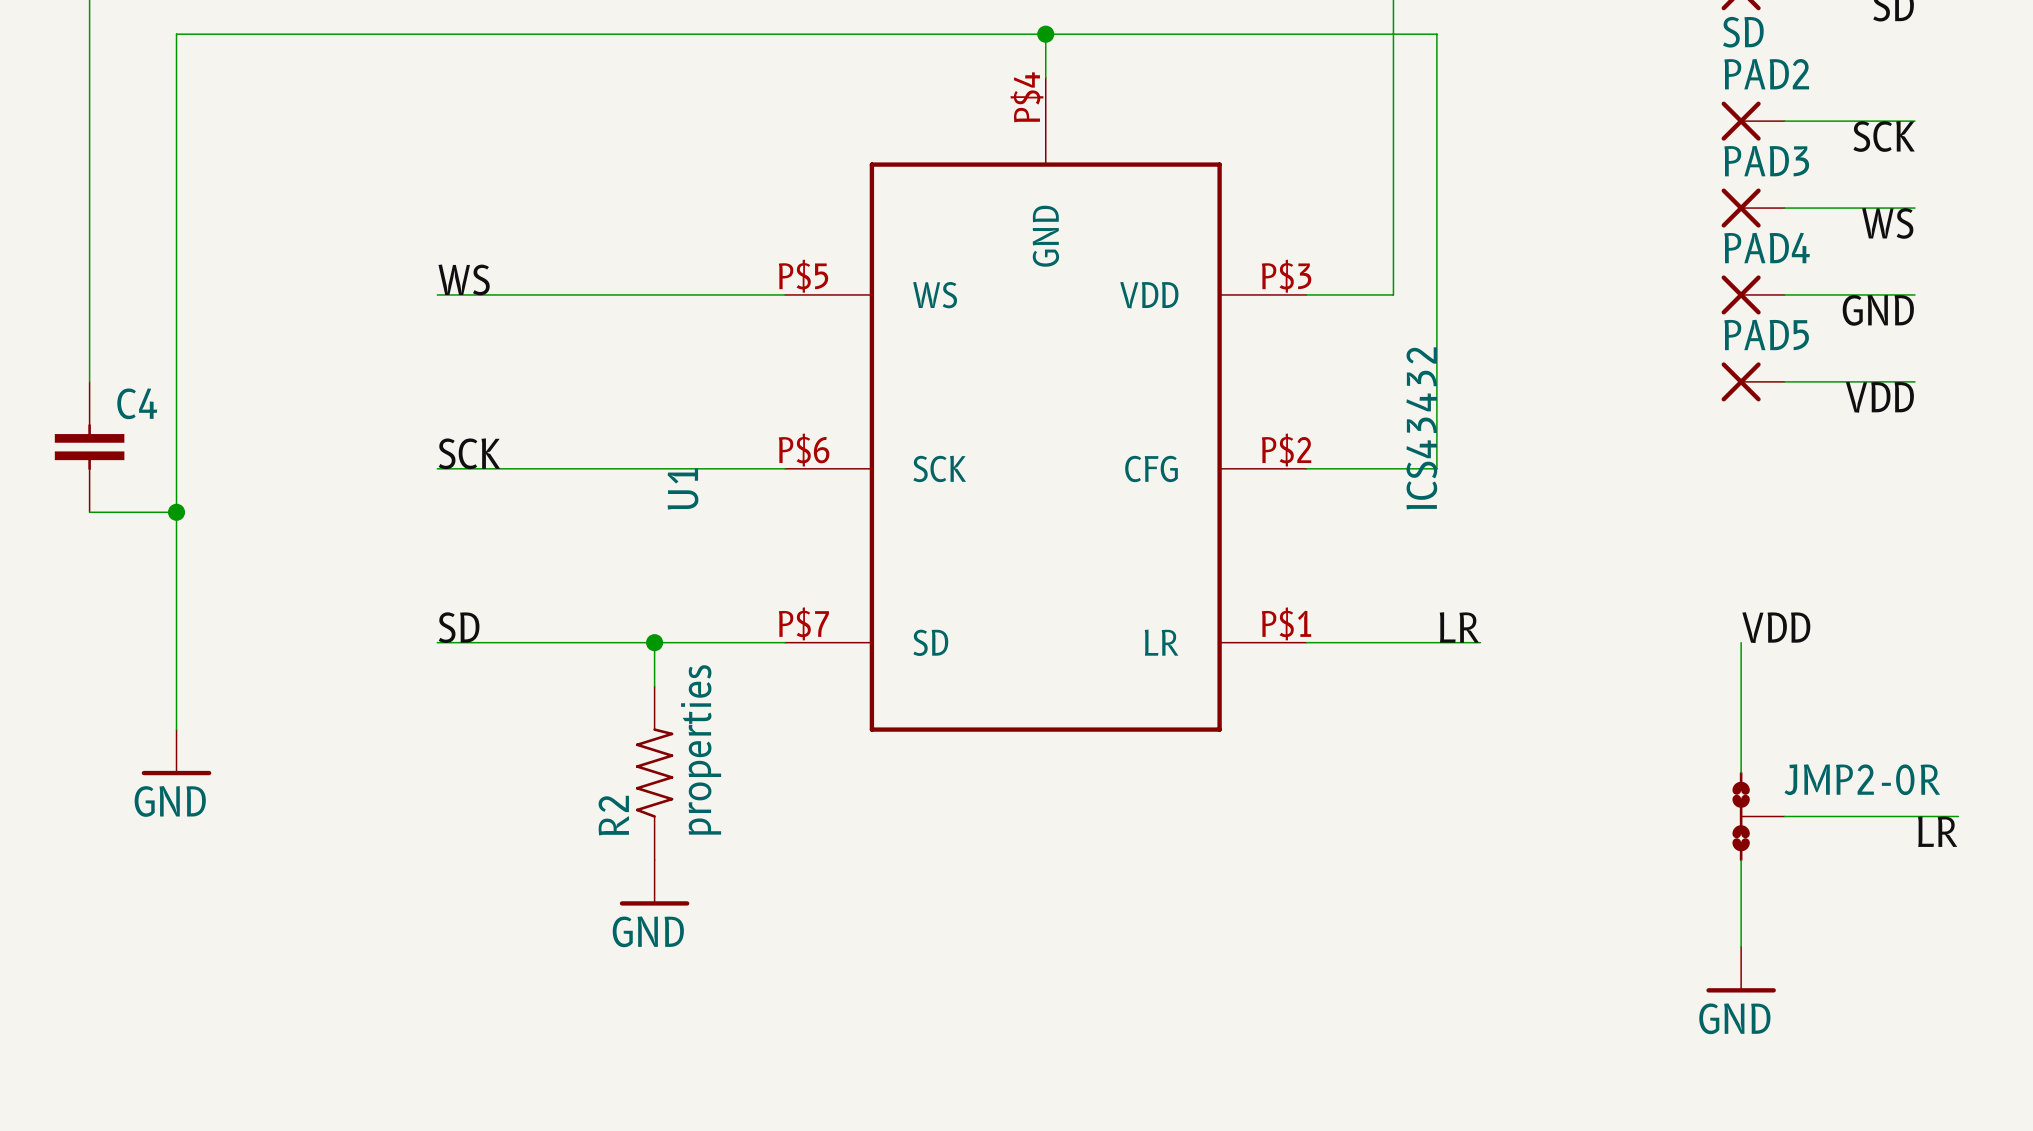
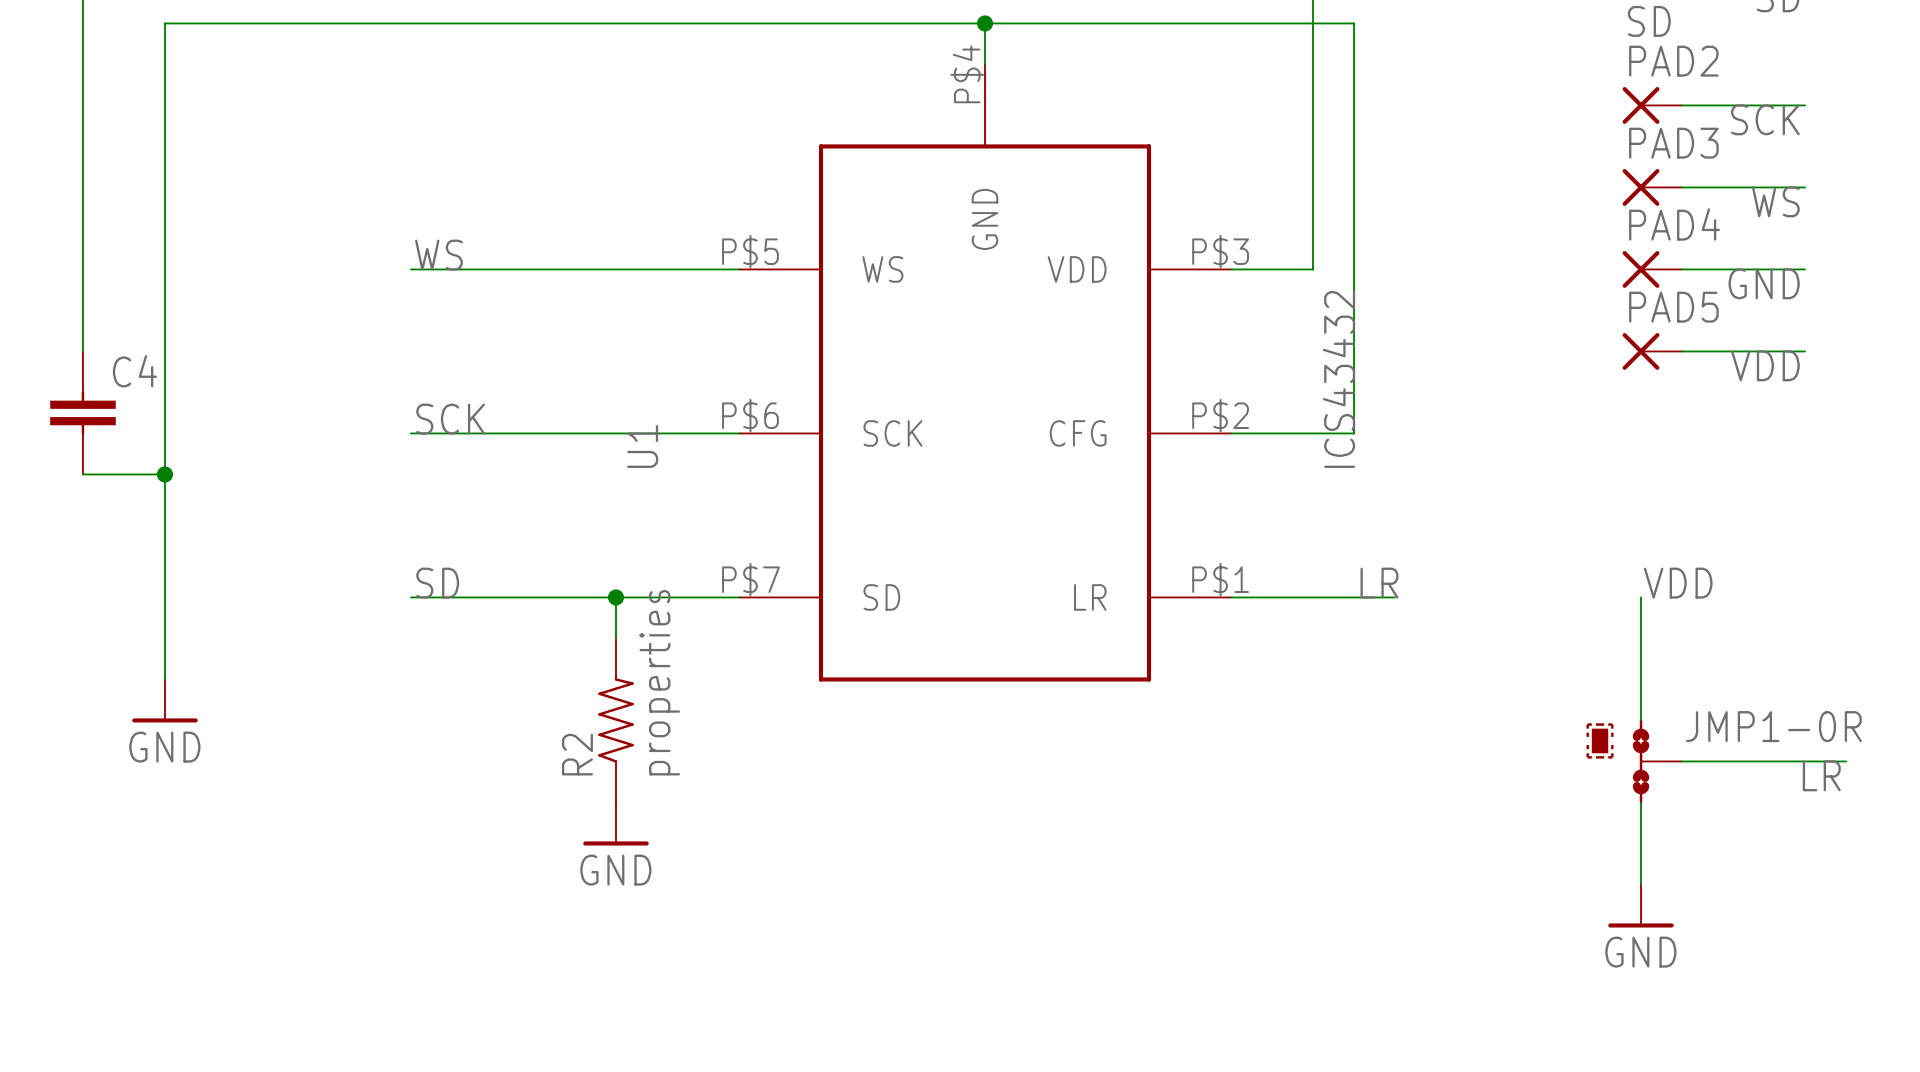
JMP2-0R name: JMP2-0R (1862, 779) -> JMP1-0R (1773, 726)
part: none -> (1600, 740)

